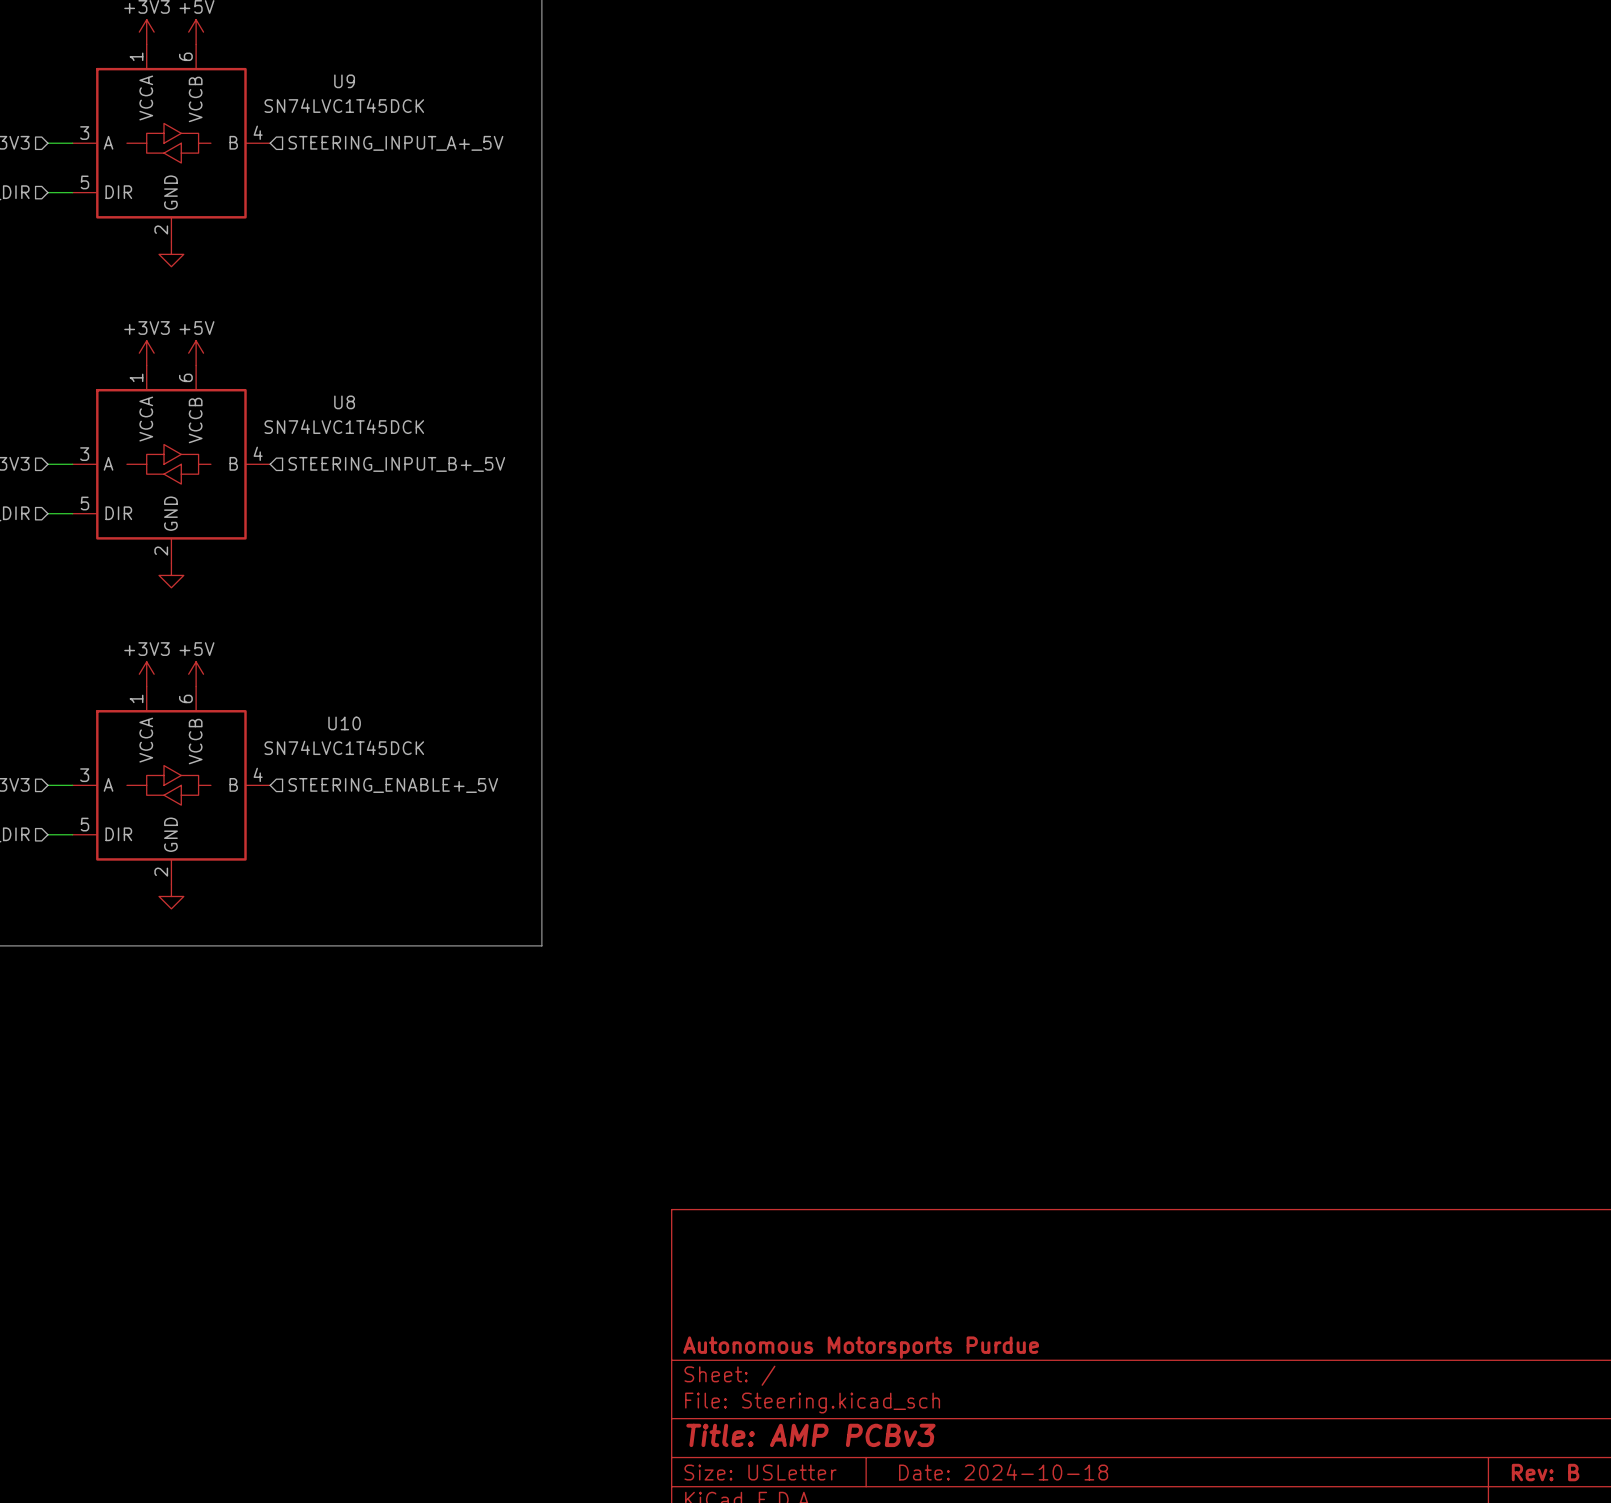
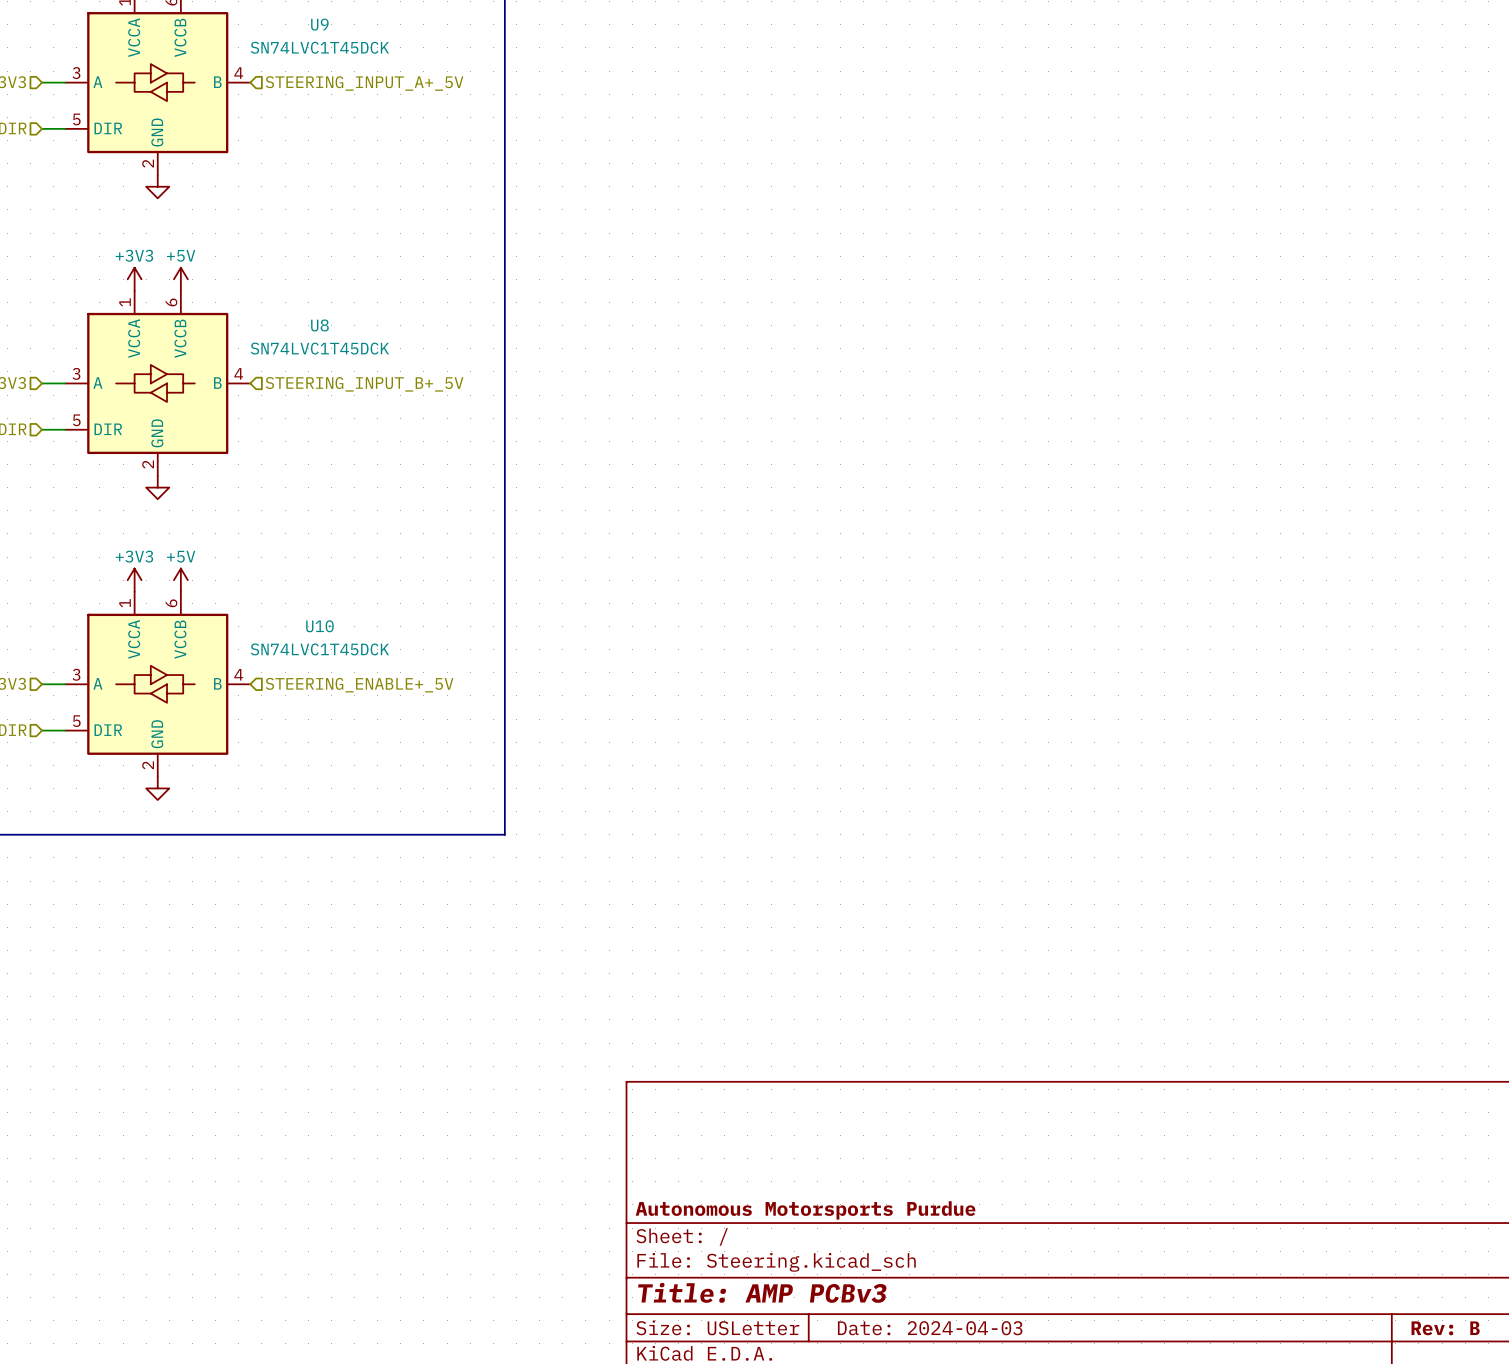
title block: Date: 2024-10-18 (1003, 1472) -> Date: 2024-04-03 (930, 1328)

